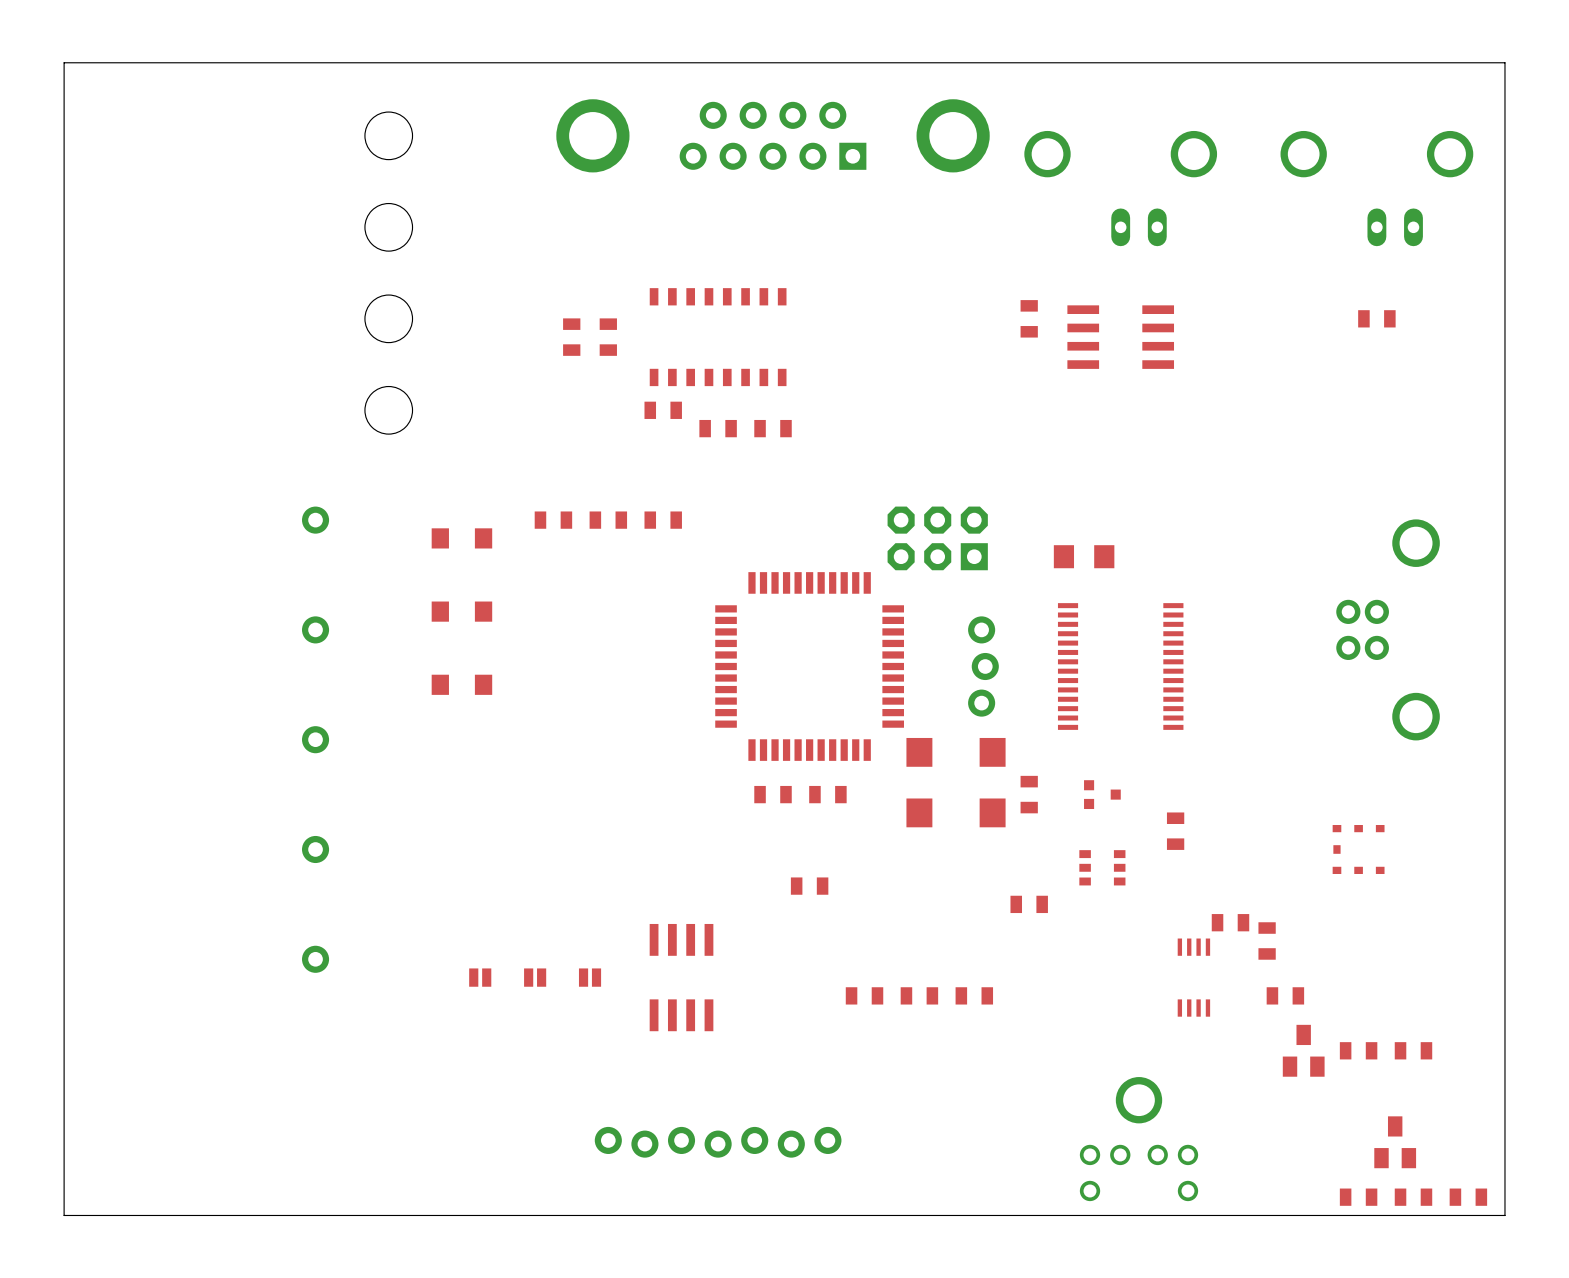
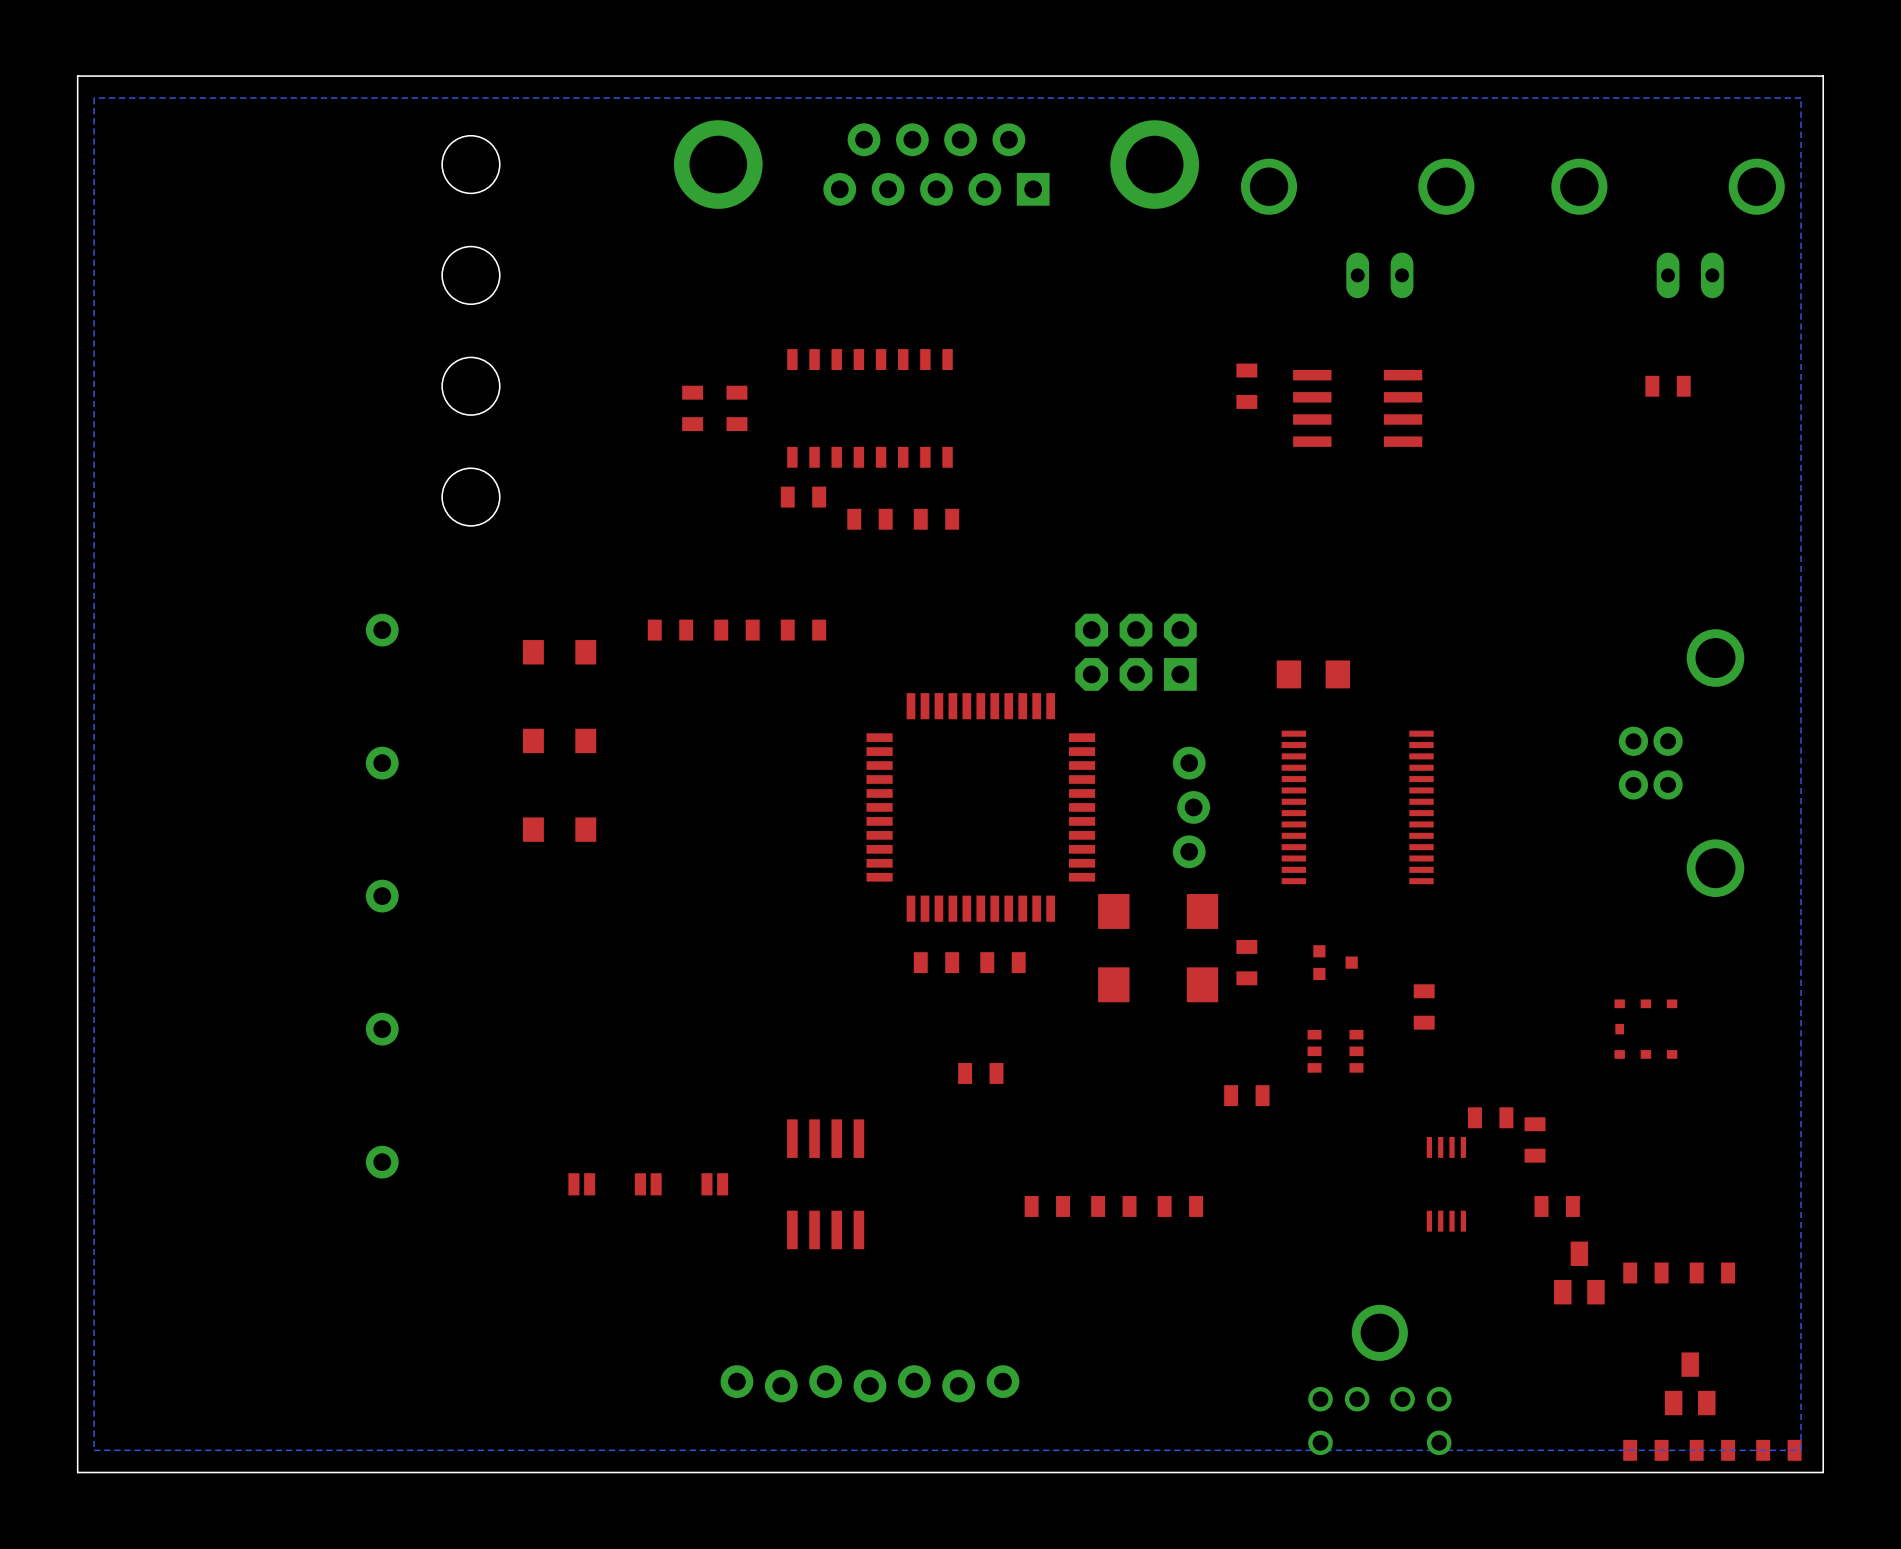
bottom zone outline: none -> (1801, 98) (94, 98) (94, 1450) (1801, 1450) (1801, 98)

